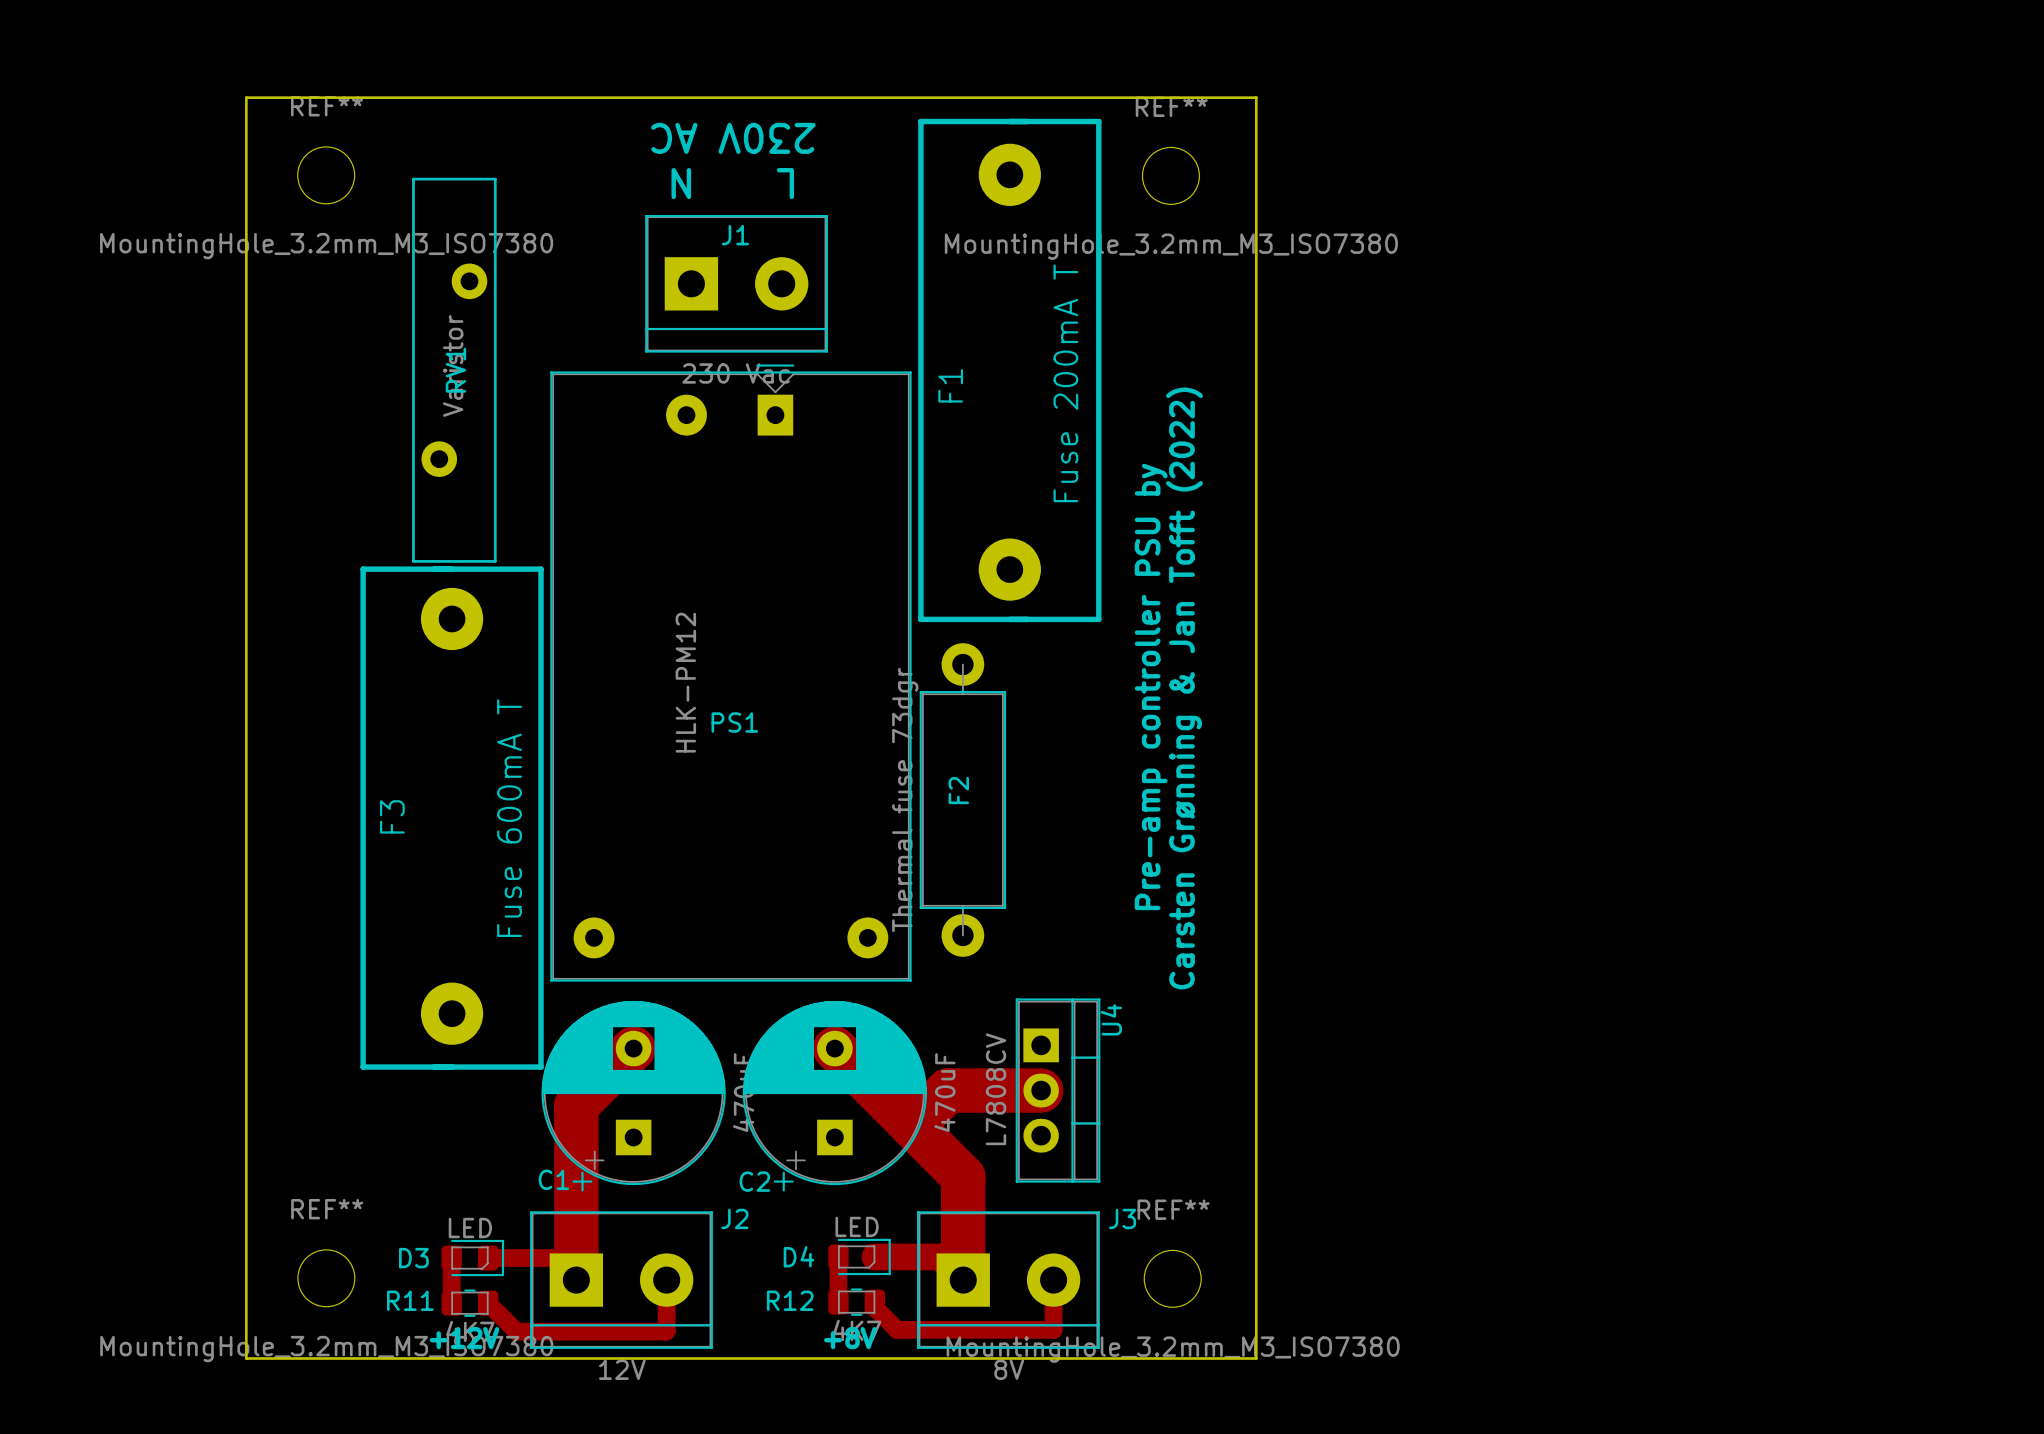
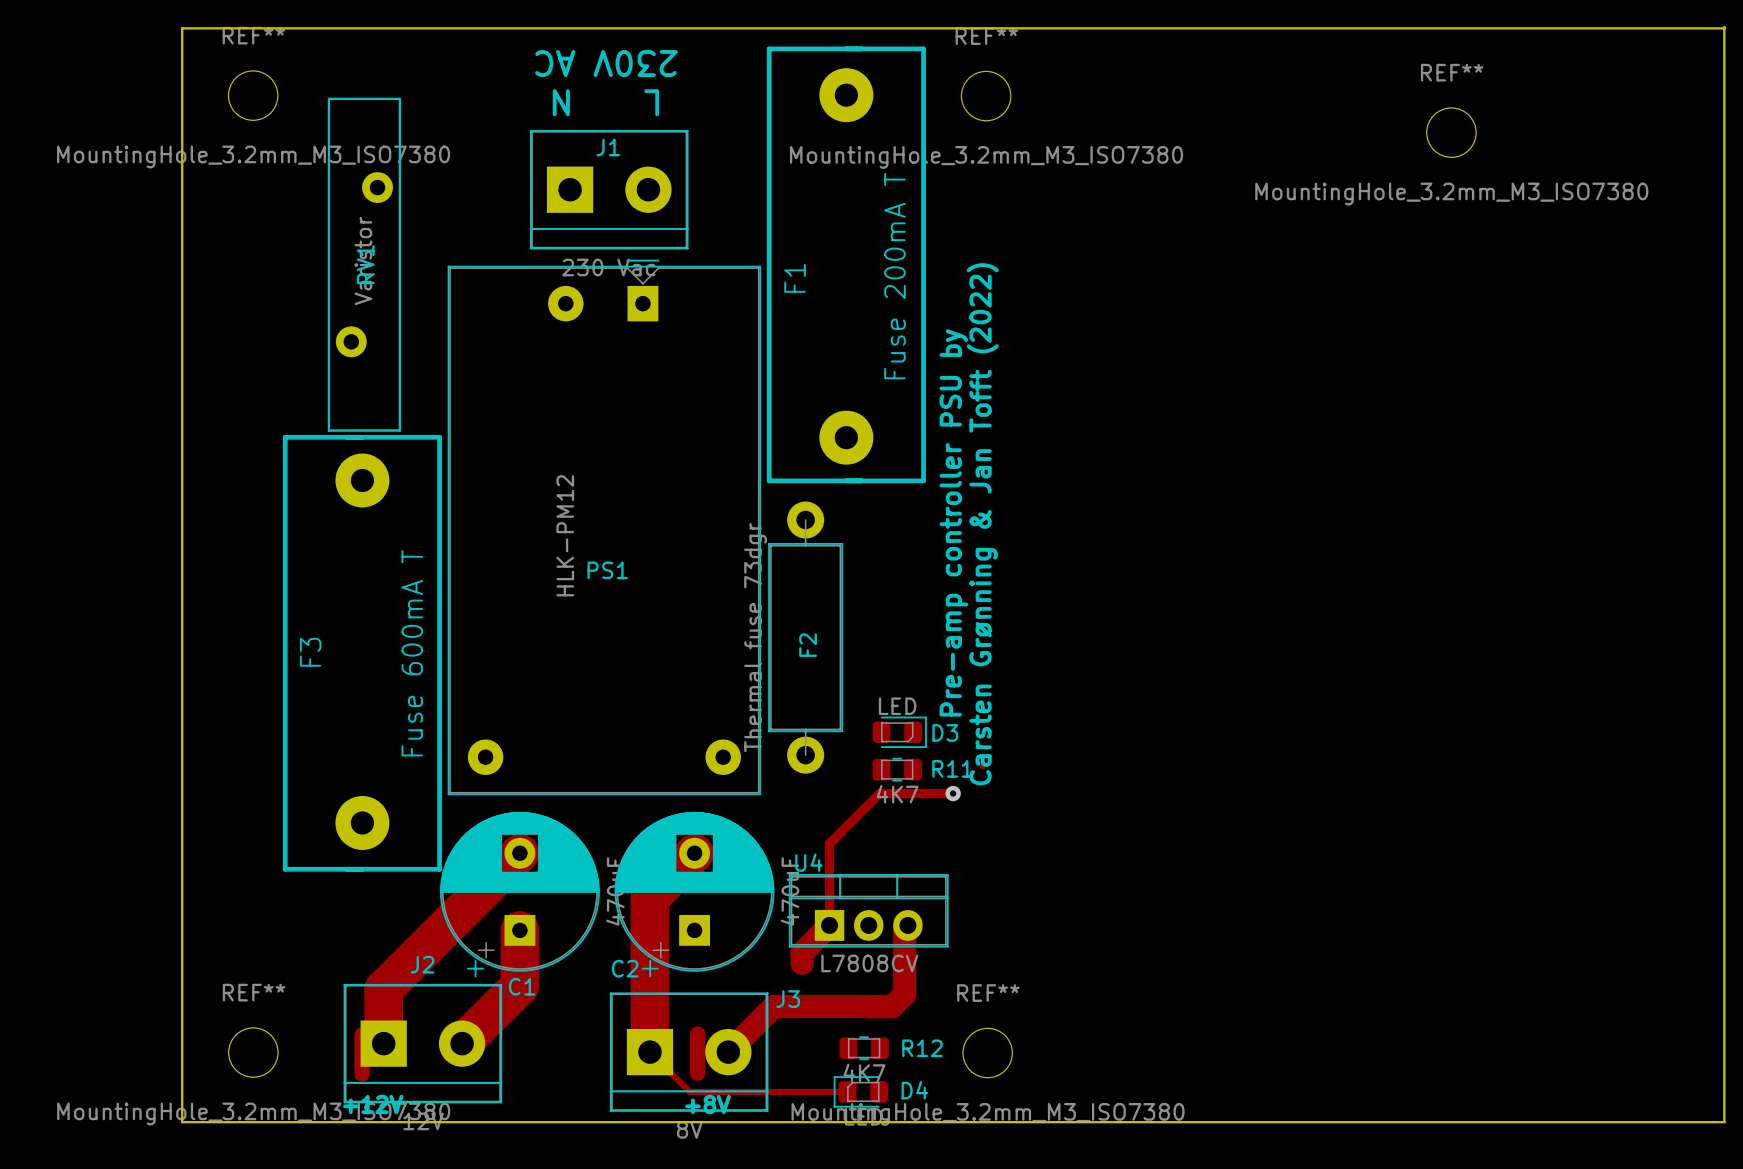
board edge: none -> (1724, 26) (1724, 1120)
REF**: none -> MountingHole_3.2mm_M3_ISO7380 (1451, 132)
text position: Pre-amp controller PSU by (1151, 686) -> Pre-amp controller PSU by (953, 522)
text position: Carsten Grønning & Jan Tofft (2022) (1184, 688) -> Carsten Grønning & Jan Tofft (2022) (982, 524)
F2 name position: F2 (958, 790) -> F2 (808, 645)
track: none -> (982, 765) (982, 766)
track: none -> (953, 793) (879, 793) (829, 843) (829, 925) (802, 952) (802, 963)
via: none -> (953, 793)
track: (834, 1048) (963, 1176) (963, 1280) (940, 1256) (874, 1256) -> (694, 853) (649, 897) (649, 1052) (689, 1091) (847, 1091)
track: (1041, 1090) (947, 1090) (912, 1126) -> none
U4 rotation: 0° (1058, 1090) -> 90° counterclockwise (868, 910)
track: (576, 1105) (576, 1280) (554, 1258) (488, 1258) -> (470, 902) (383, 989) (383, 1043)
track: none -> (913, 919) (904, 928) (904, 994) (892, 1006) (774, 1006) (728, 1052)
track: none -> (519, 930) (519, 985) (462, 1043)
C1 name position: C1 (553, 1179) -> C1 (522, 986)
J2 name position: J2 (734, 1218) -> J2 (422, 964)
D4 rotation: 0° (859, 1256) -> 180° (860, 1091)
D4 position: (859, 1256) -> (860, 1091)
D3 name position: D3 (413, 1258) -> D3 (945, 732)
D3 position: (472, 1258) -> (899, 732)
J2 position: (621, 1280) -> (422, 1043)
track: (666, 1280) (665, 1331) (516, 1331) (488, 1303) -> none
J3 position: (1008, 1280) -> (689, 1052)
track: (1053, 1280) (1053, 1329) (897, 1329) (874, 1307) (874, 1302) -> none
R11 name position: R11 (410, 1300) -> R11 (952, 768)
R12 name position: R12 (790, 1300) -> R12 (922, 1048)
R12 position: (856, 1302) -> (864, 1048)
R11 position: (469, 1303) -> (897, 769)
board edge: (246, 1358) (246, 97) (1256, 97) (1256, 1358) -> (183, 1122) (182, 1122) (182, 28) (1724, 28)
board edge: none -> (1060, 1122) (1724, 1122)

